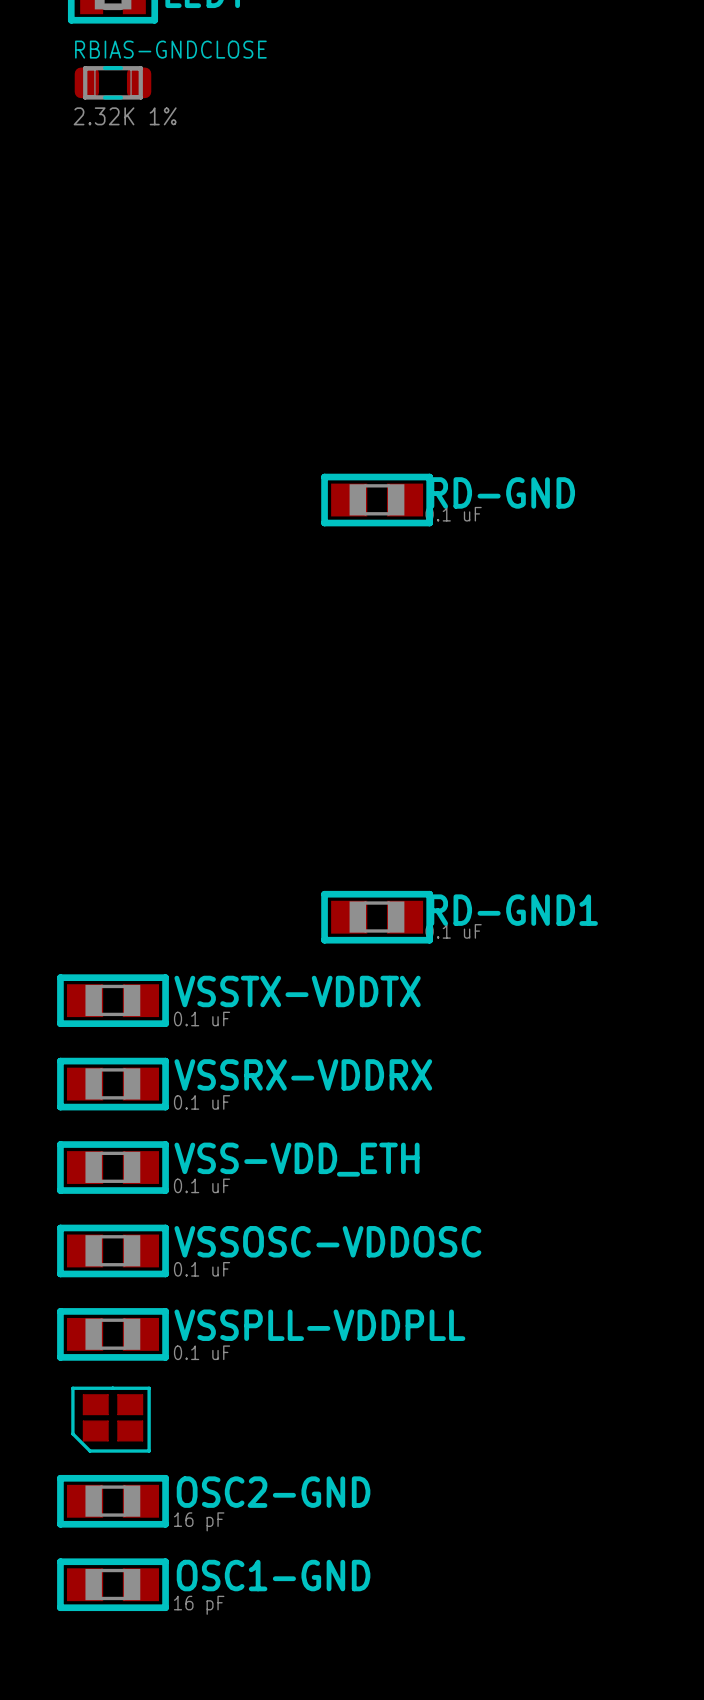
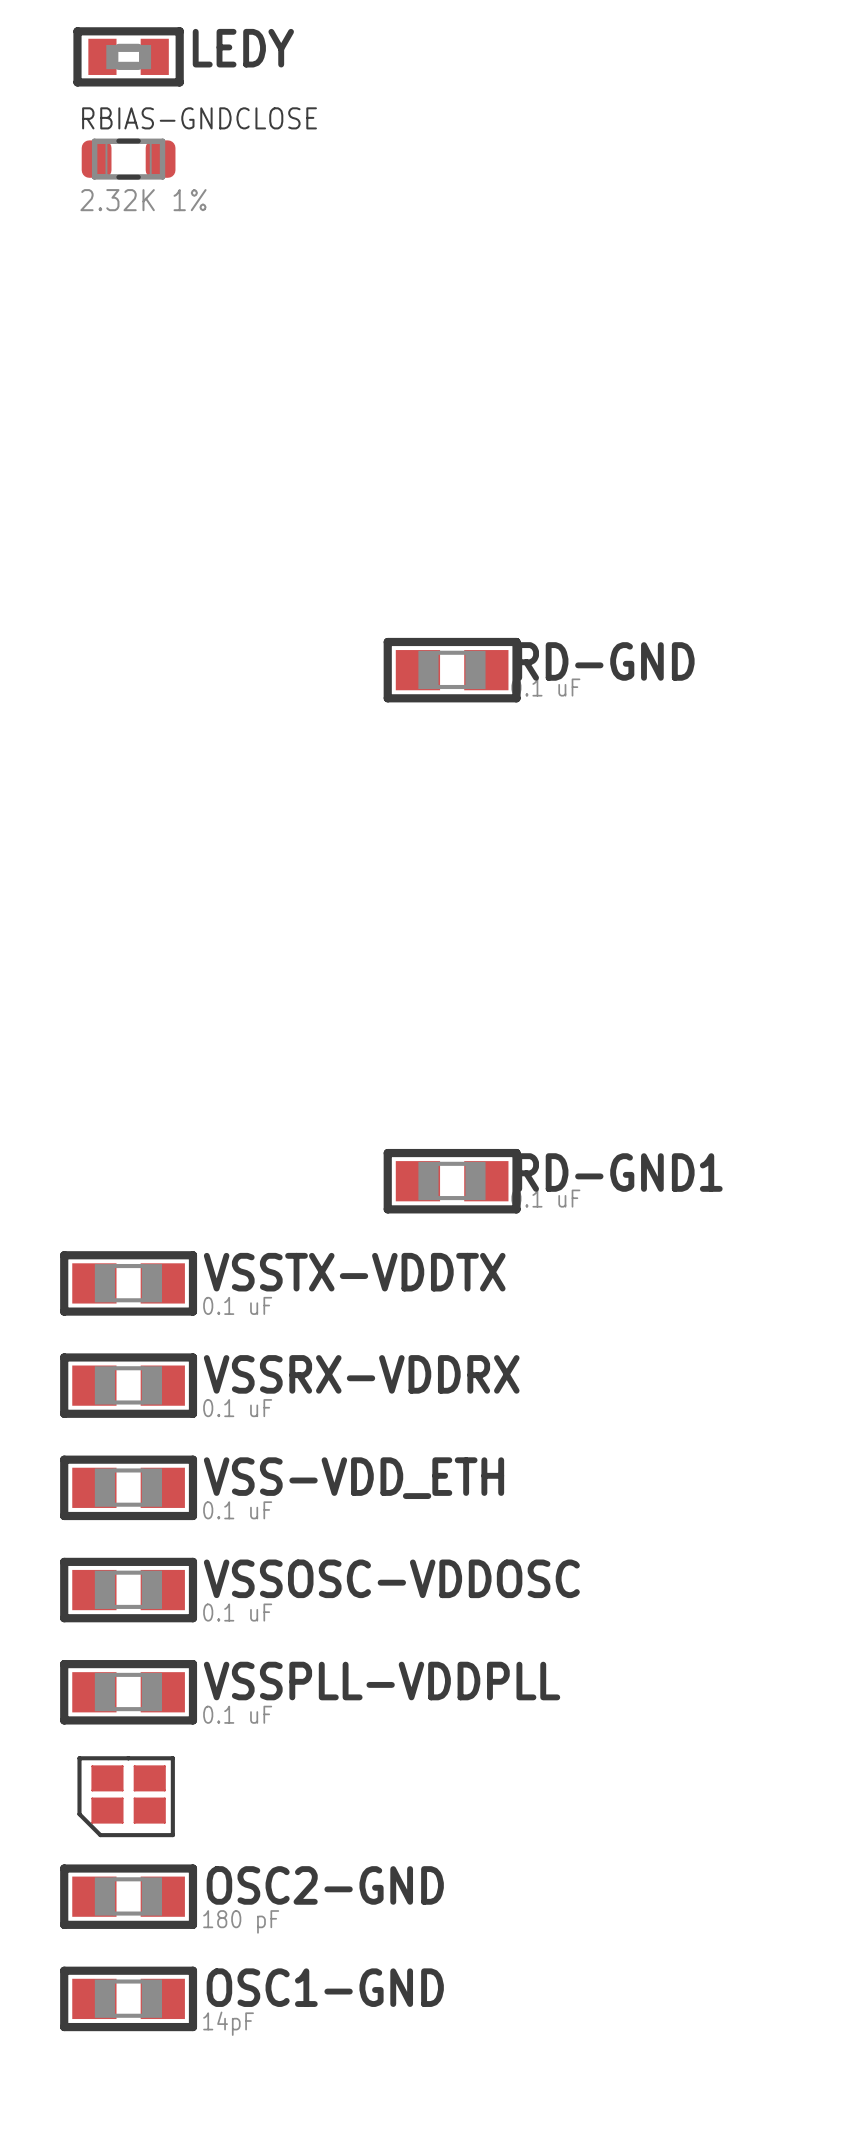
OSC2-GND value: 16 pF (199, 1521) -> 180 pF (241, 1921)
OSC1-GND value: 16 pF (199, 1605) -> 14pF (228, 2023)

